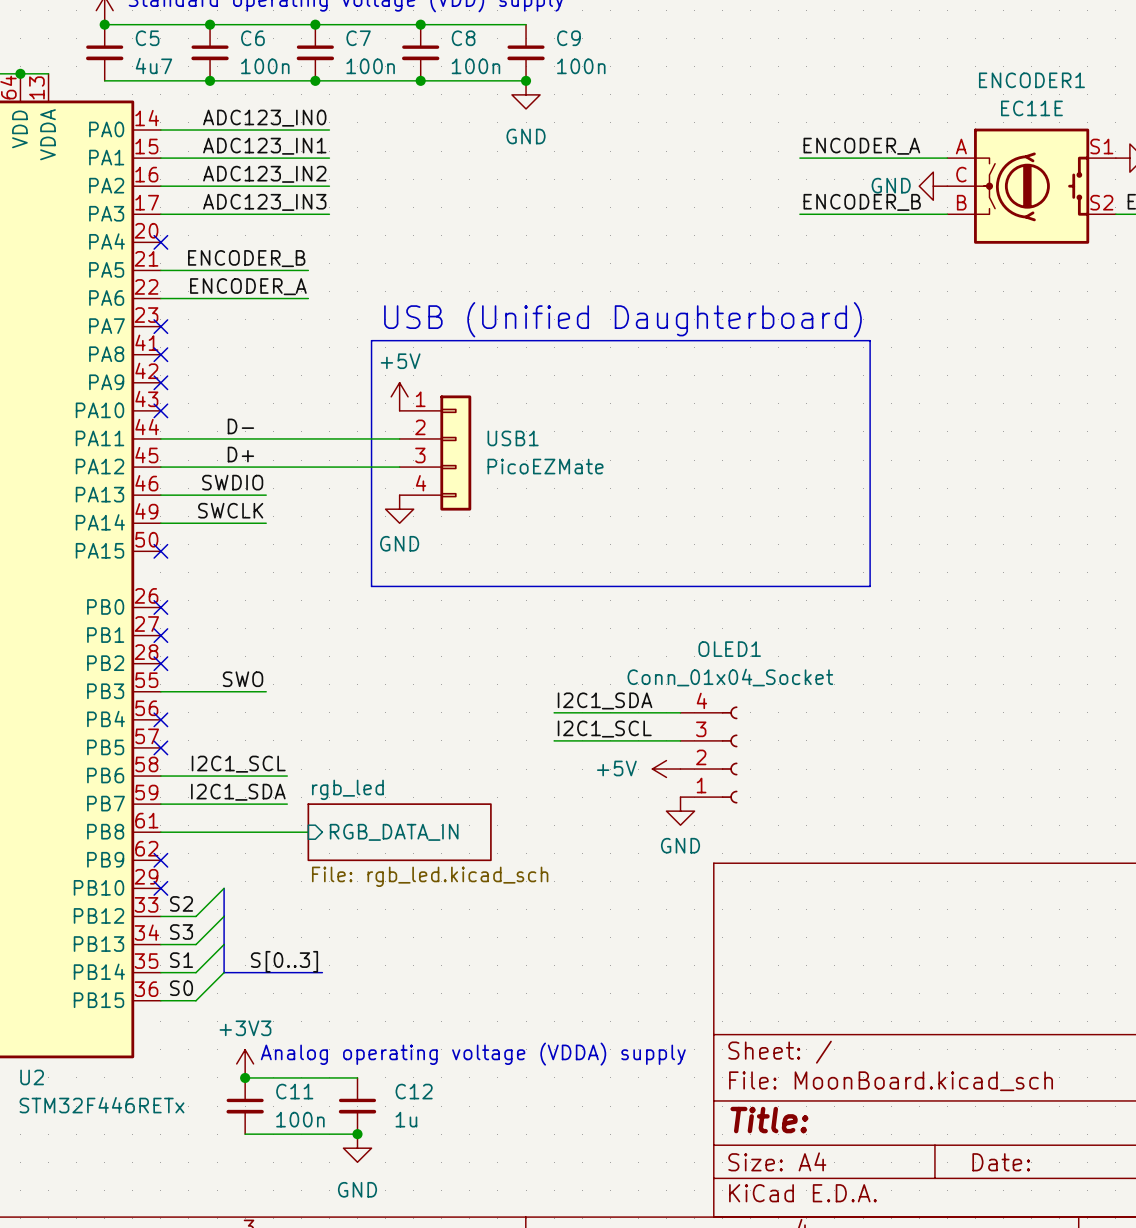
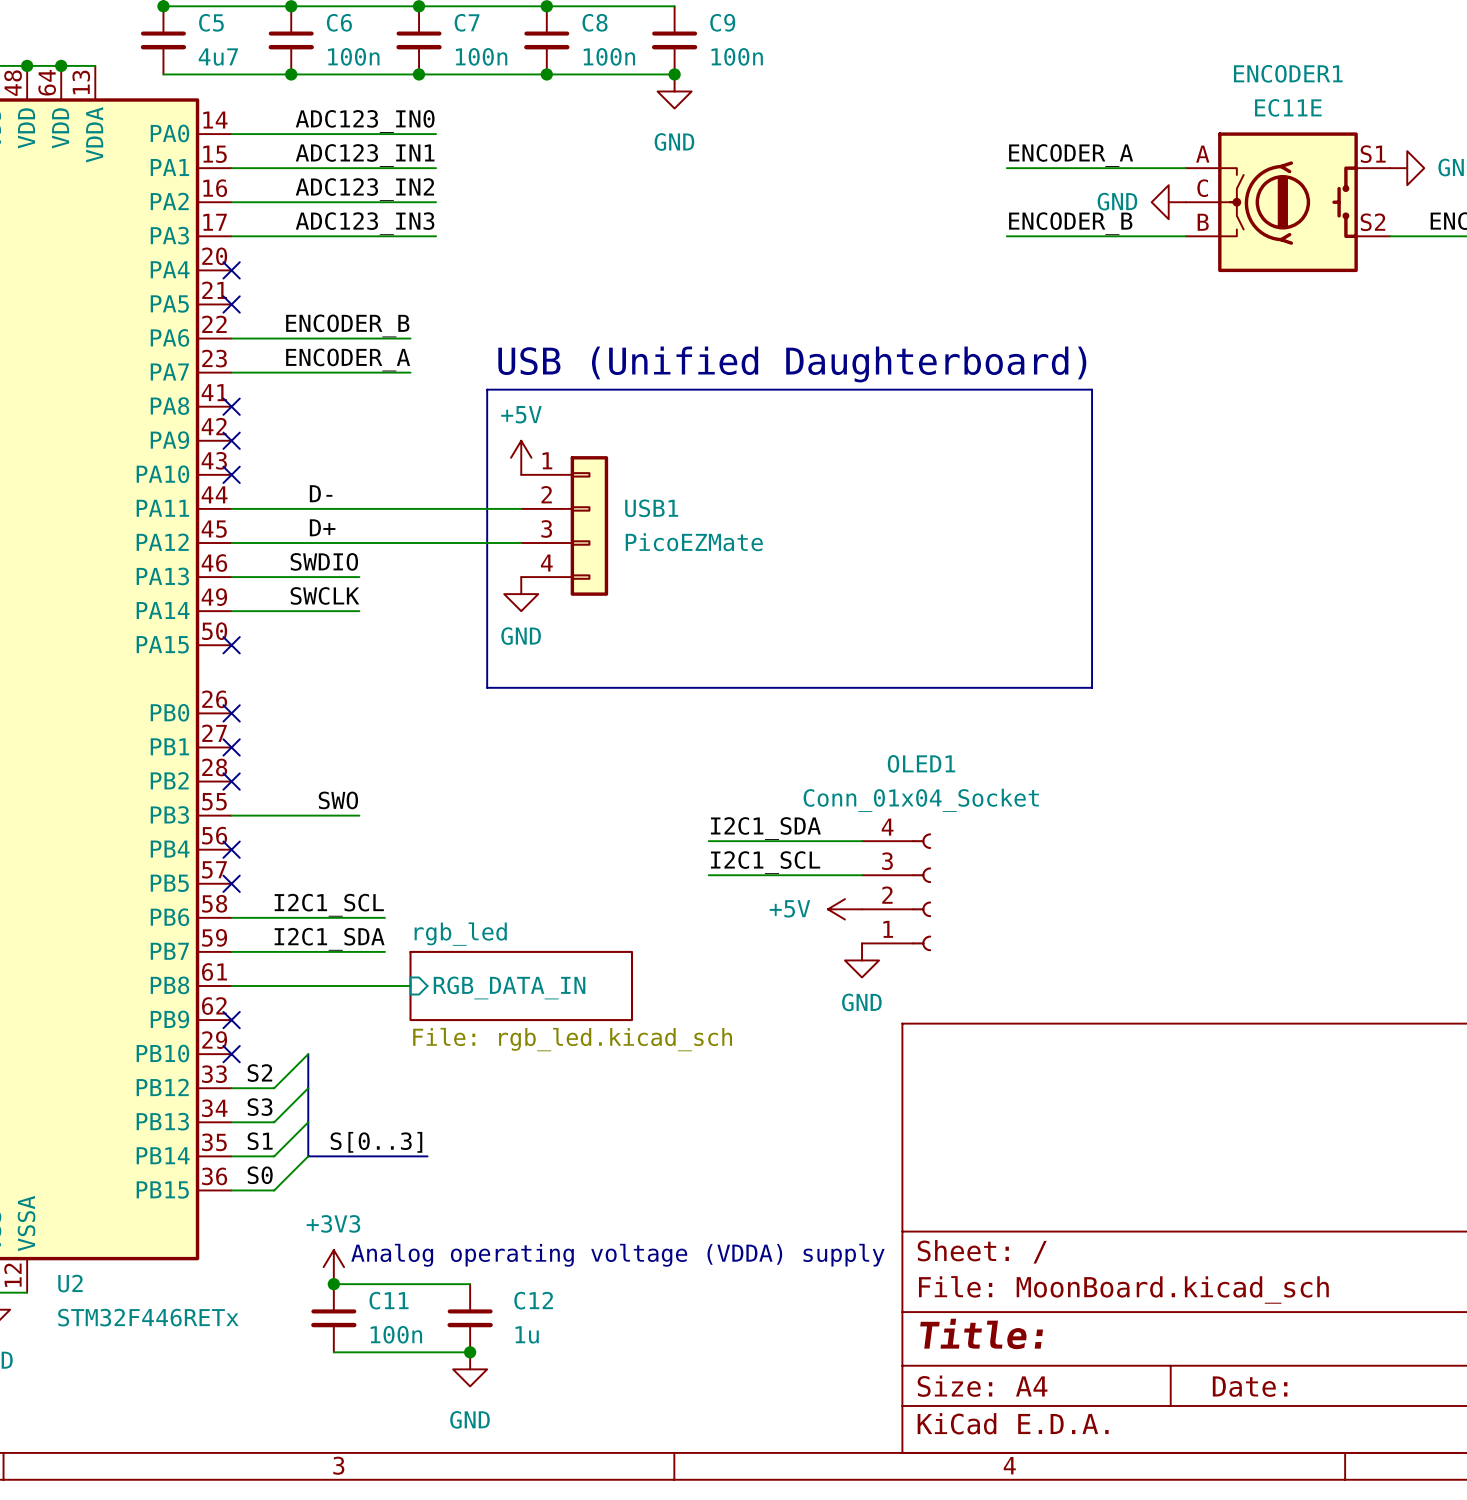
label: ENCODER_B (246, 258) -> none
wire: (160, 270) (308, 270) -> (231, 372) (410, 372)
label: ENCODER_A (248, 286) -> ENCODER_B (347, 325)
label: none -> ENCODER_A (348, 360)
no-connect mark position: (160, 326) -> (231, 304)

